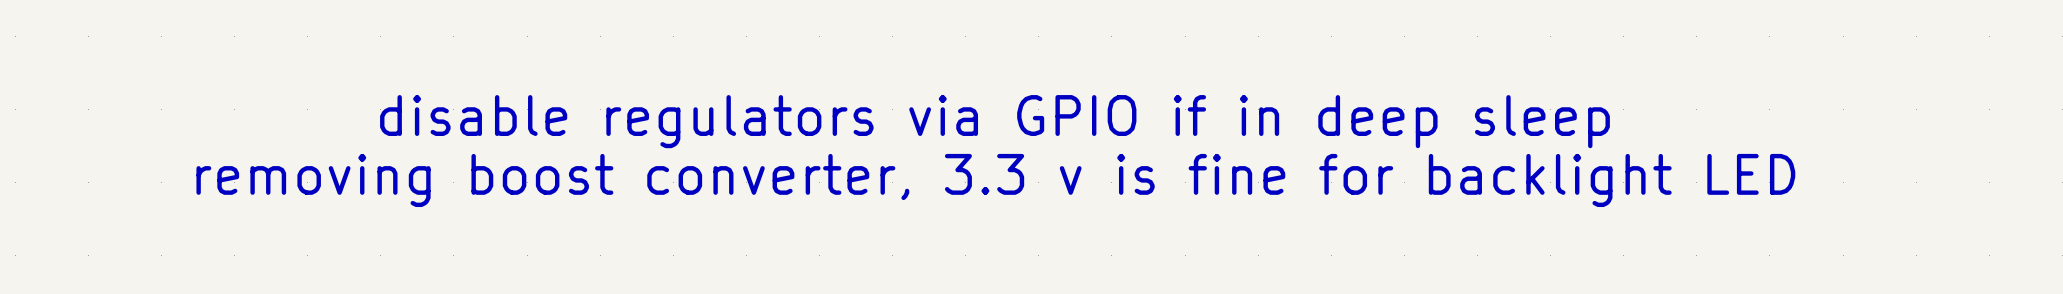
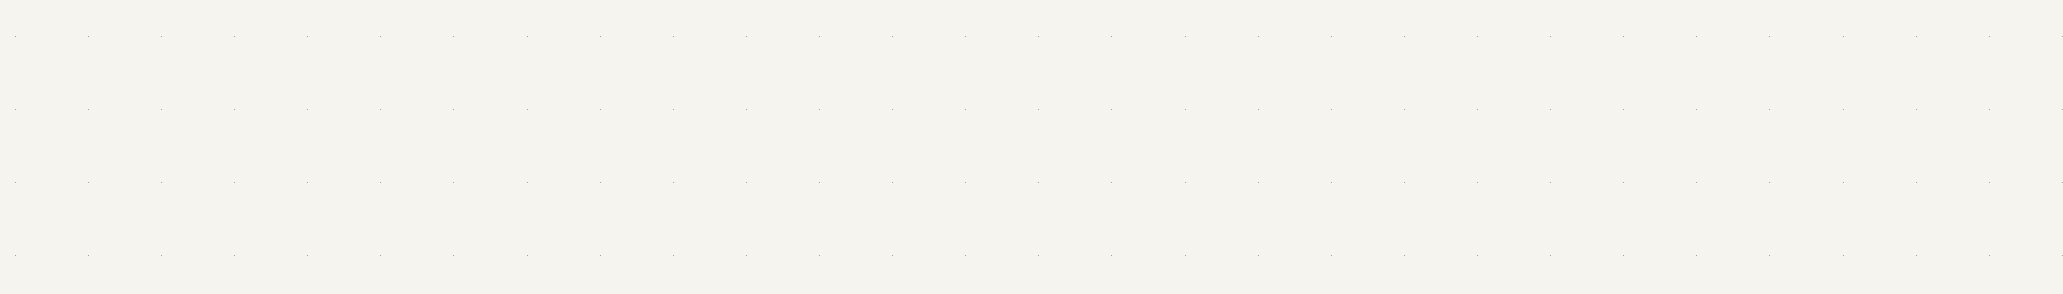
text: disable regulators via GPIO if in deep sleep (994, 121) -> none
text: removing boost converter, 3.3 v is fine for backlight LED (995, 180) -> none

